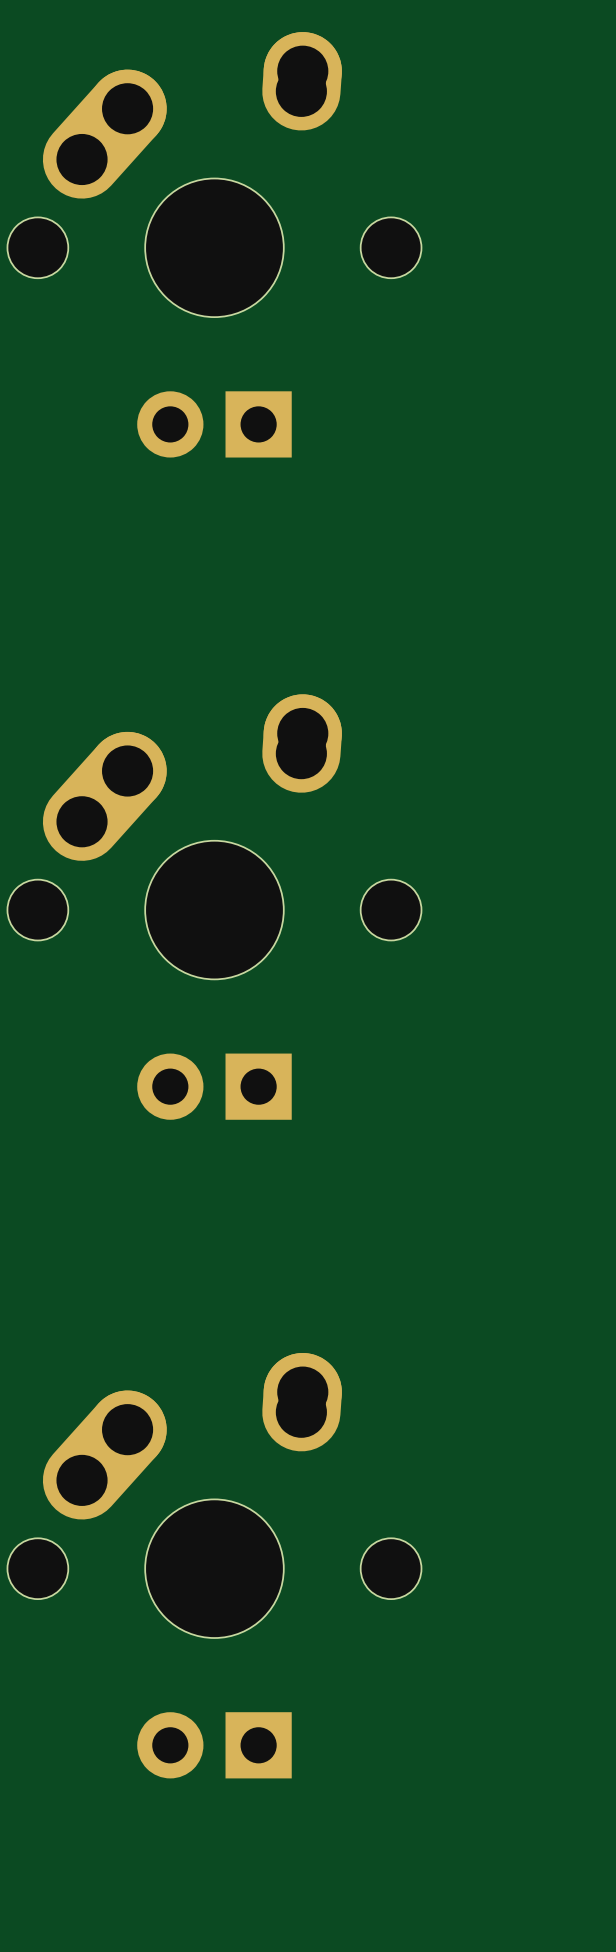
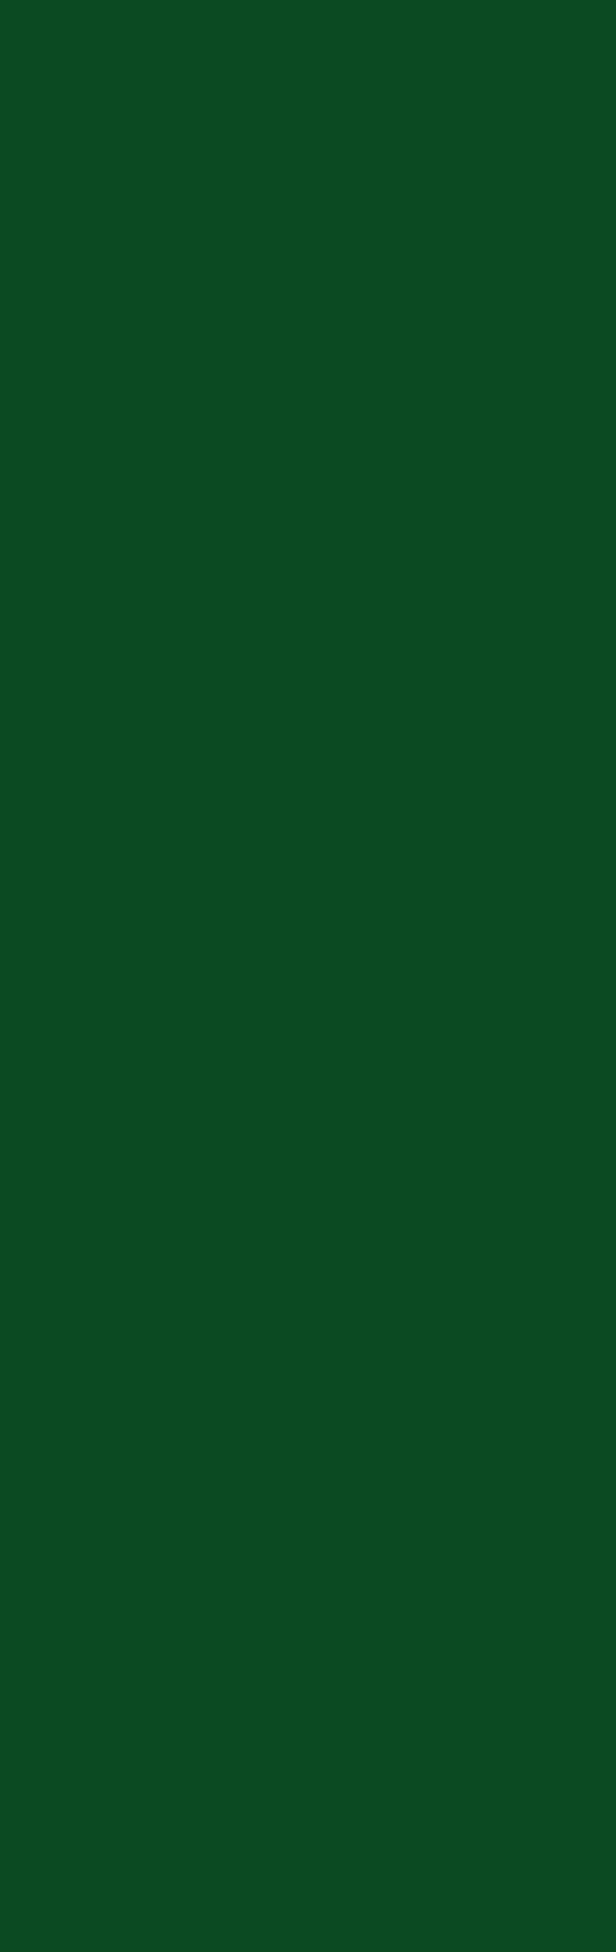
part: (214, 244) -> none
part: (214, 907) -> none
part: (214, 1565) -> none

